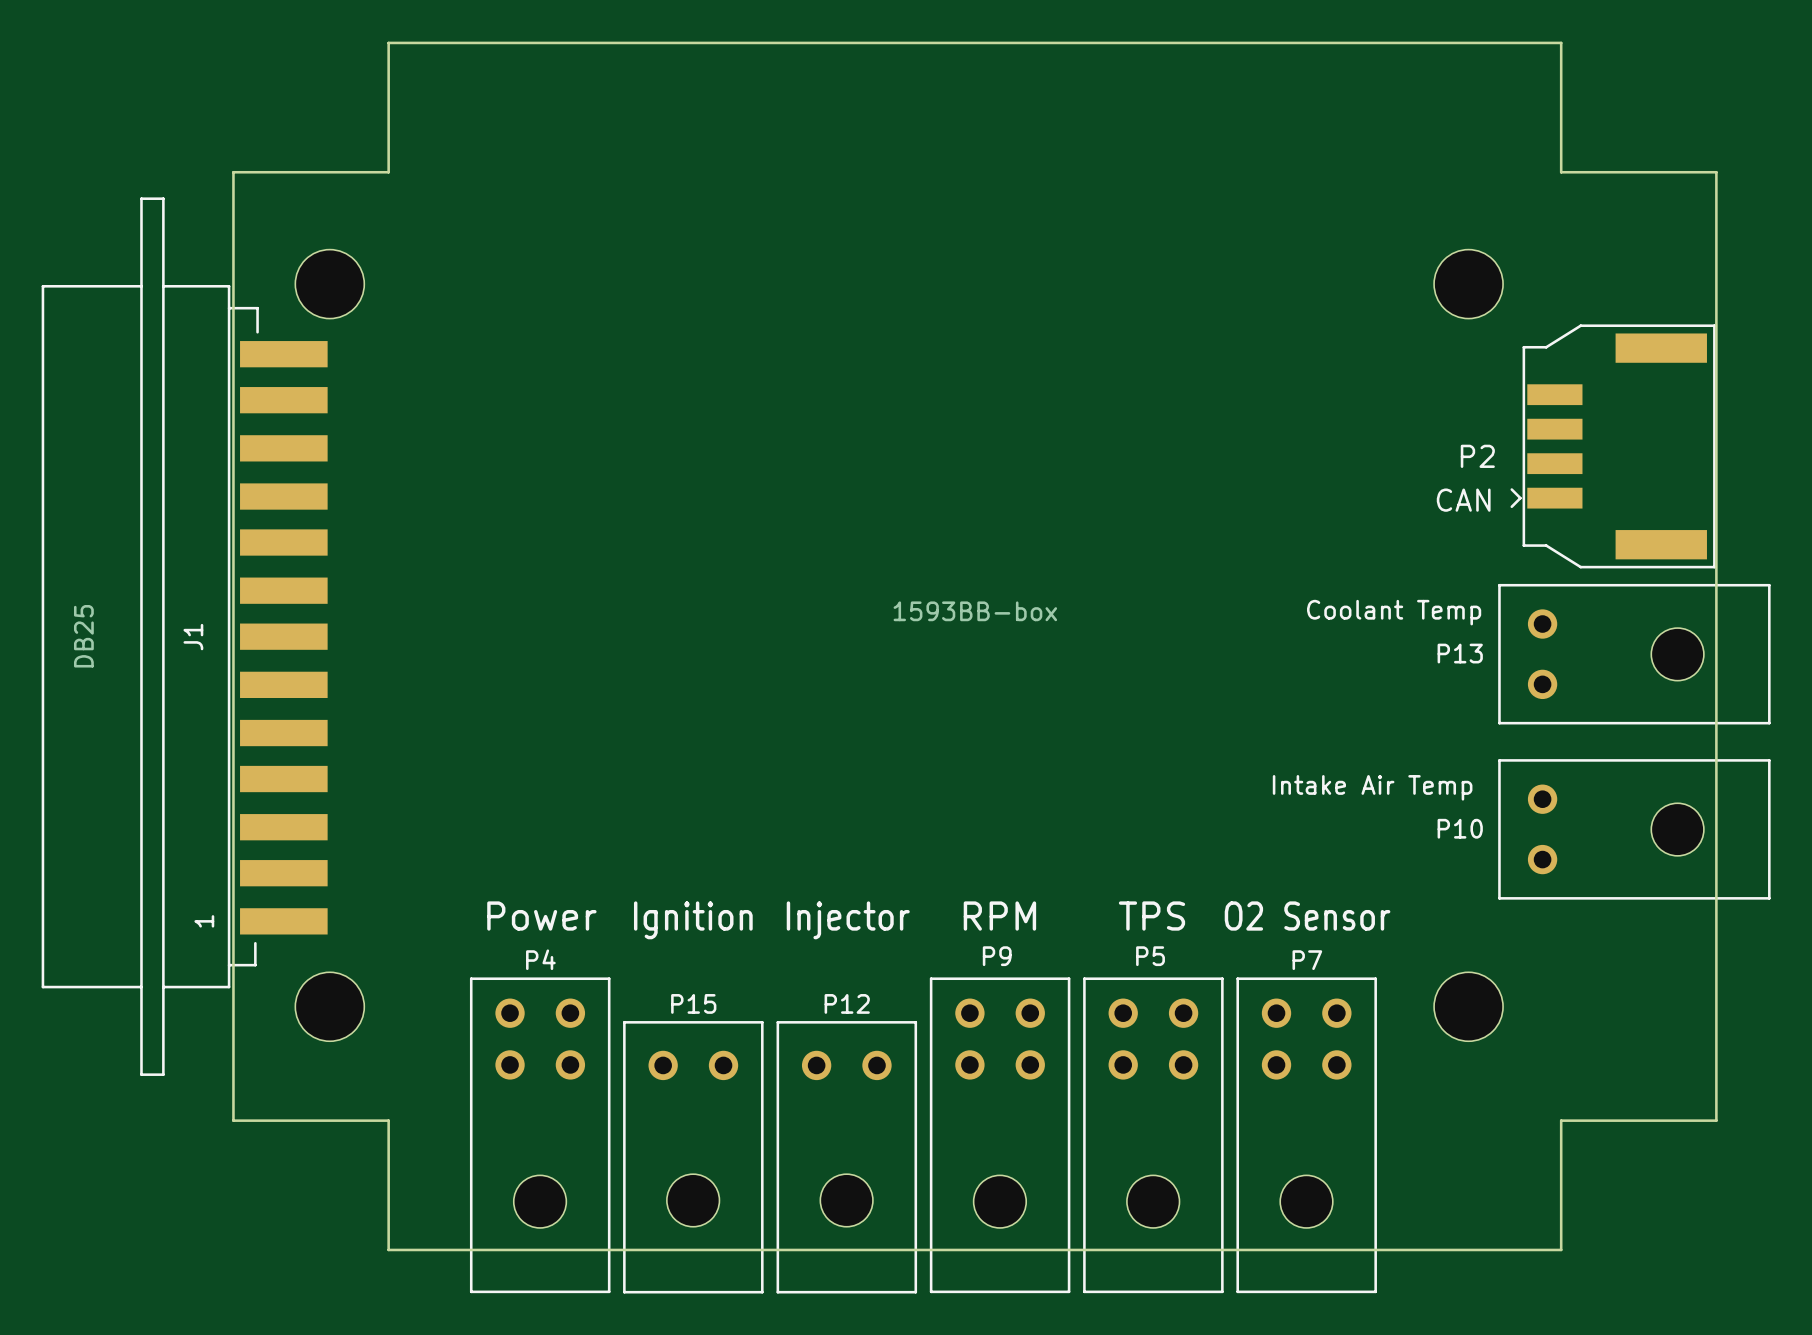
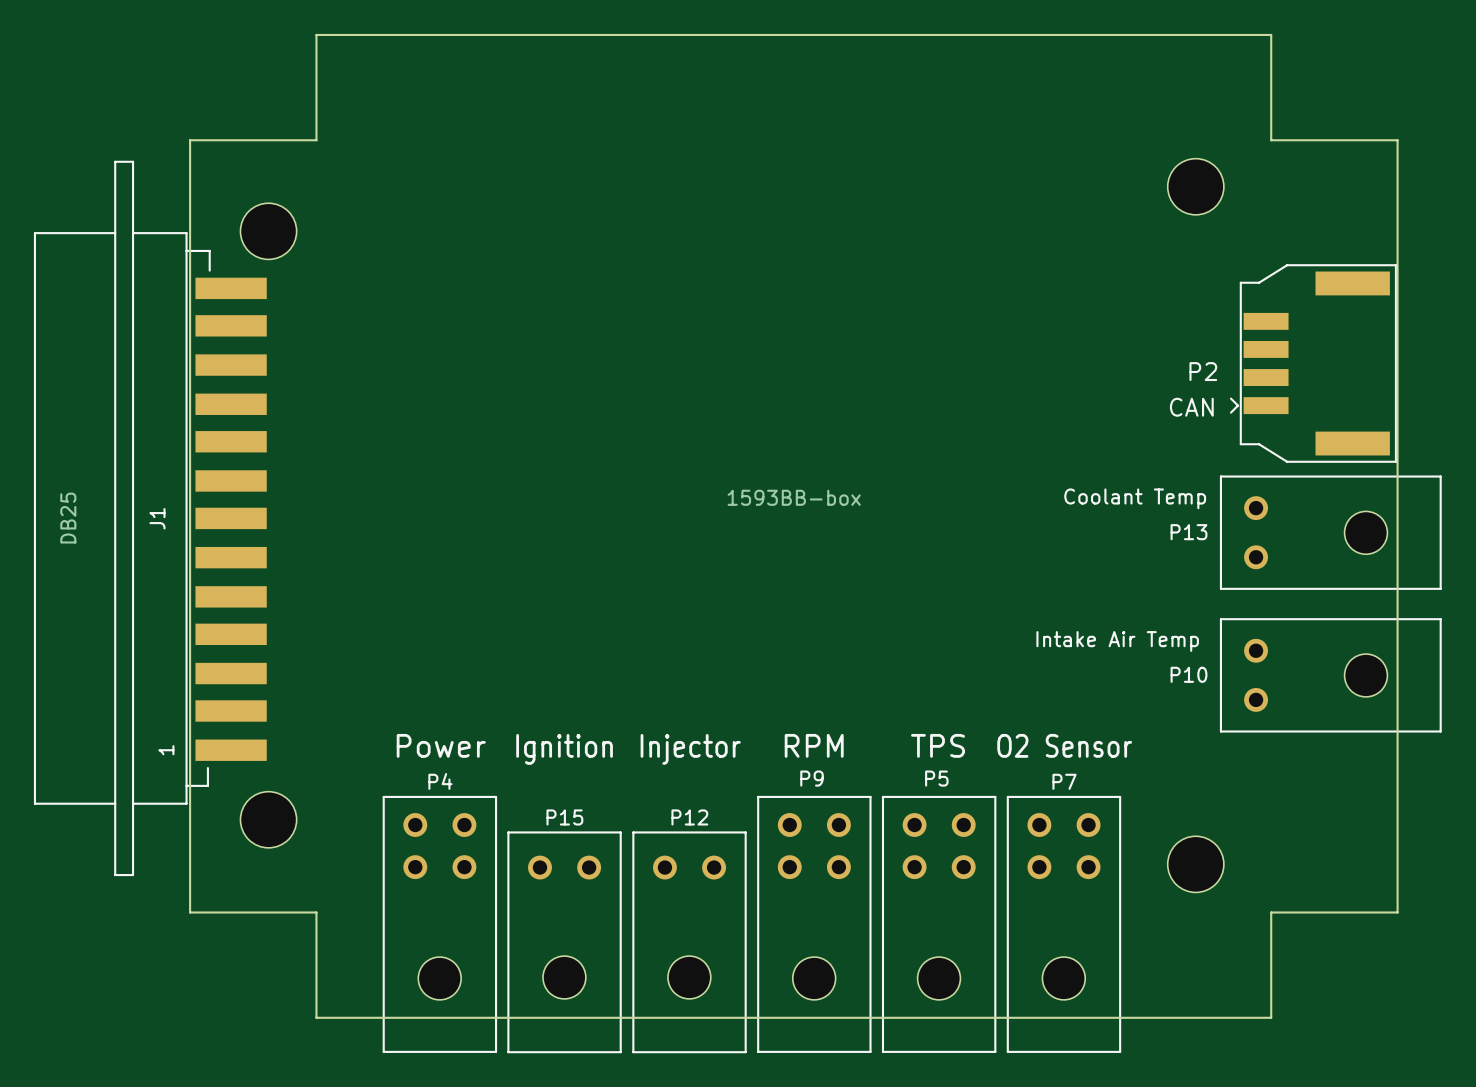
part footprint: [232, 41, 1718, 1252] -> [189, 33, 1399, 1019]

